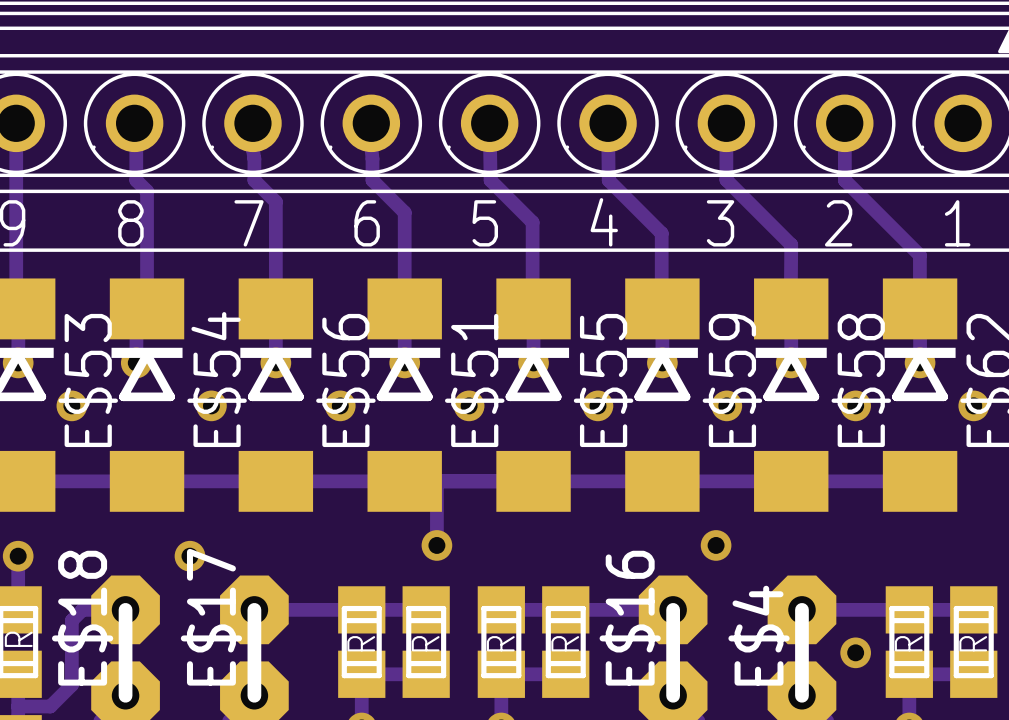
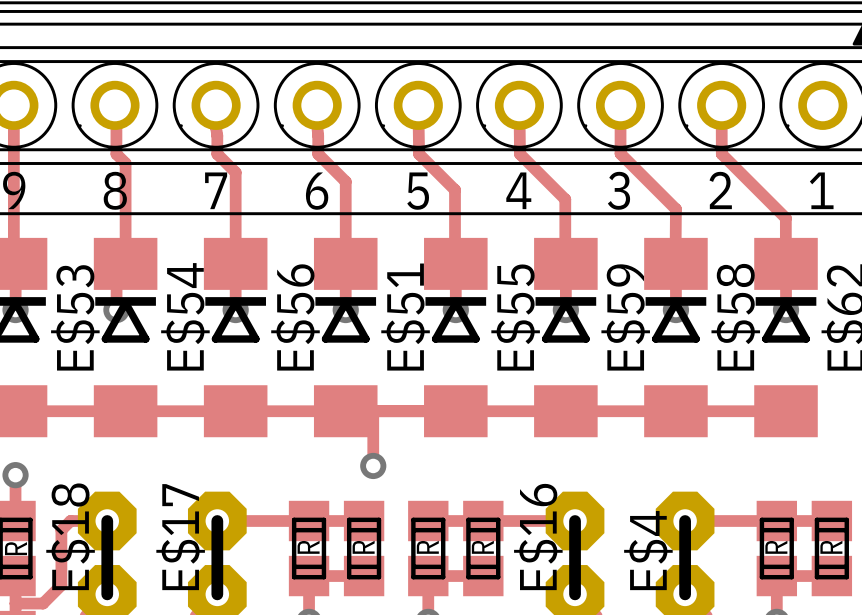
via: (71, 405) -> none
via: (211, 405) -> none
via: (340, 405) -> none
via: (469, 405) -> none
via: (597, 405) -> none
via: (726, 405) -> none
via: (855, 405) -> none
via: (973, 405) -> none
via: (716, 545) -> none
via: (189, 556) -> none
via: (855, 652) -> none

